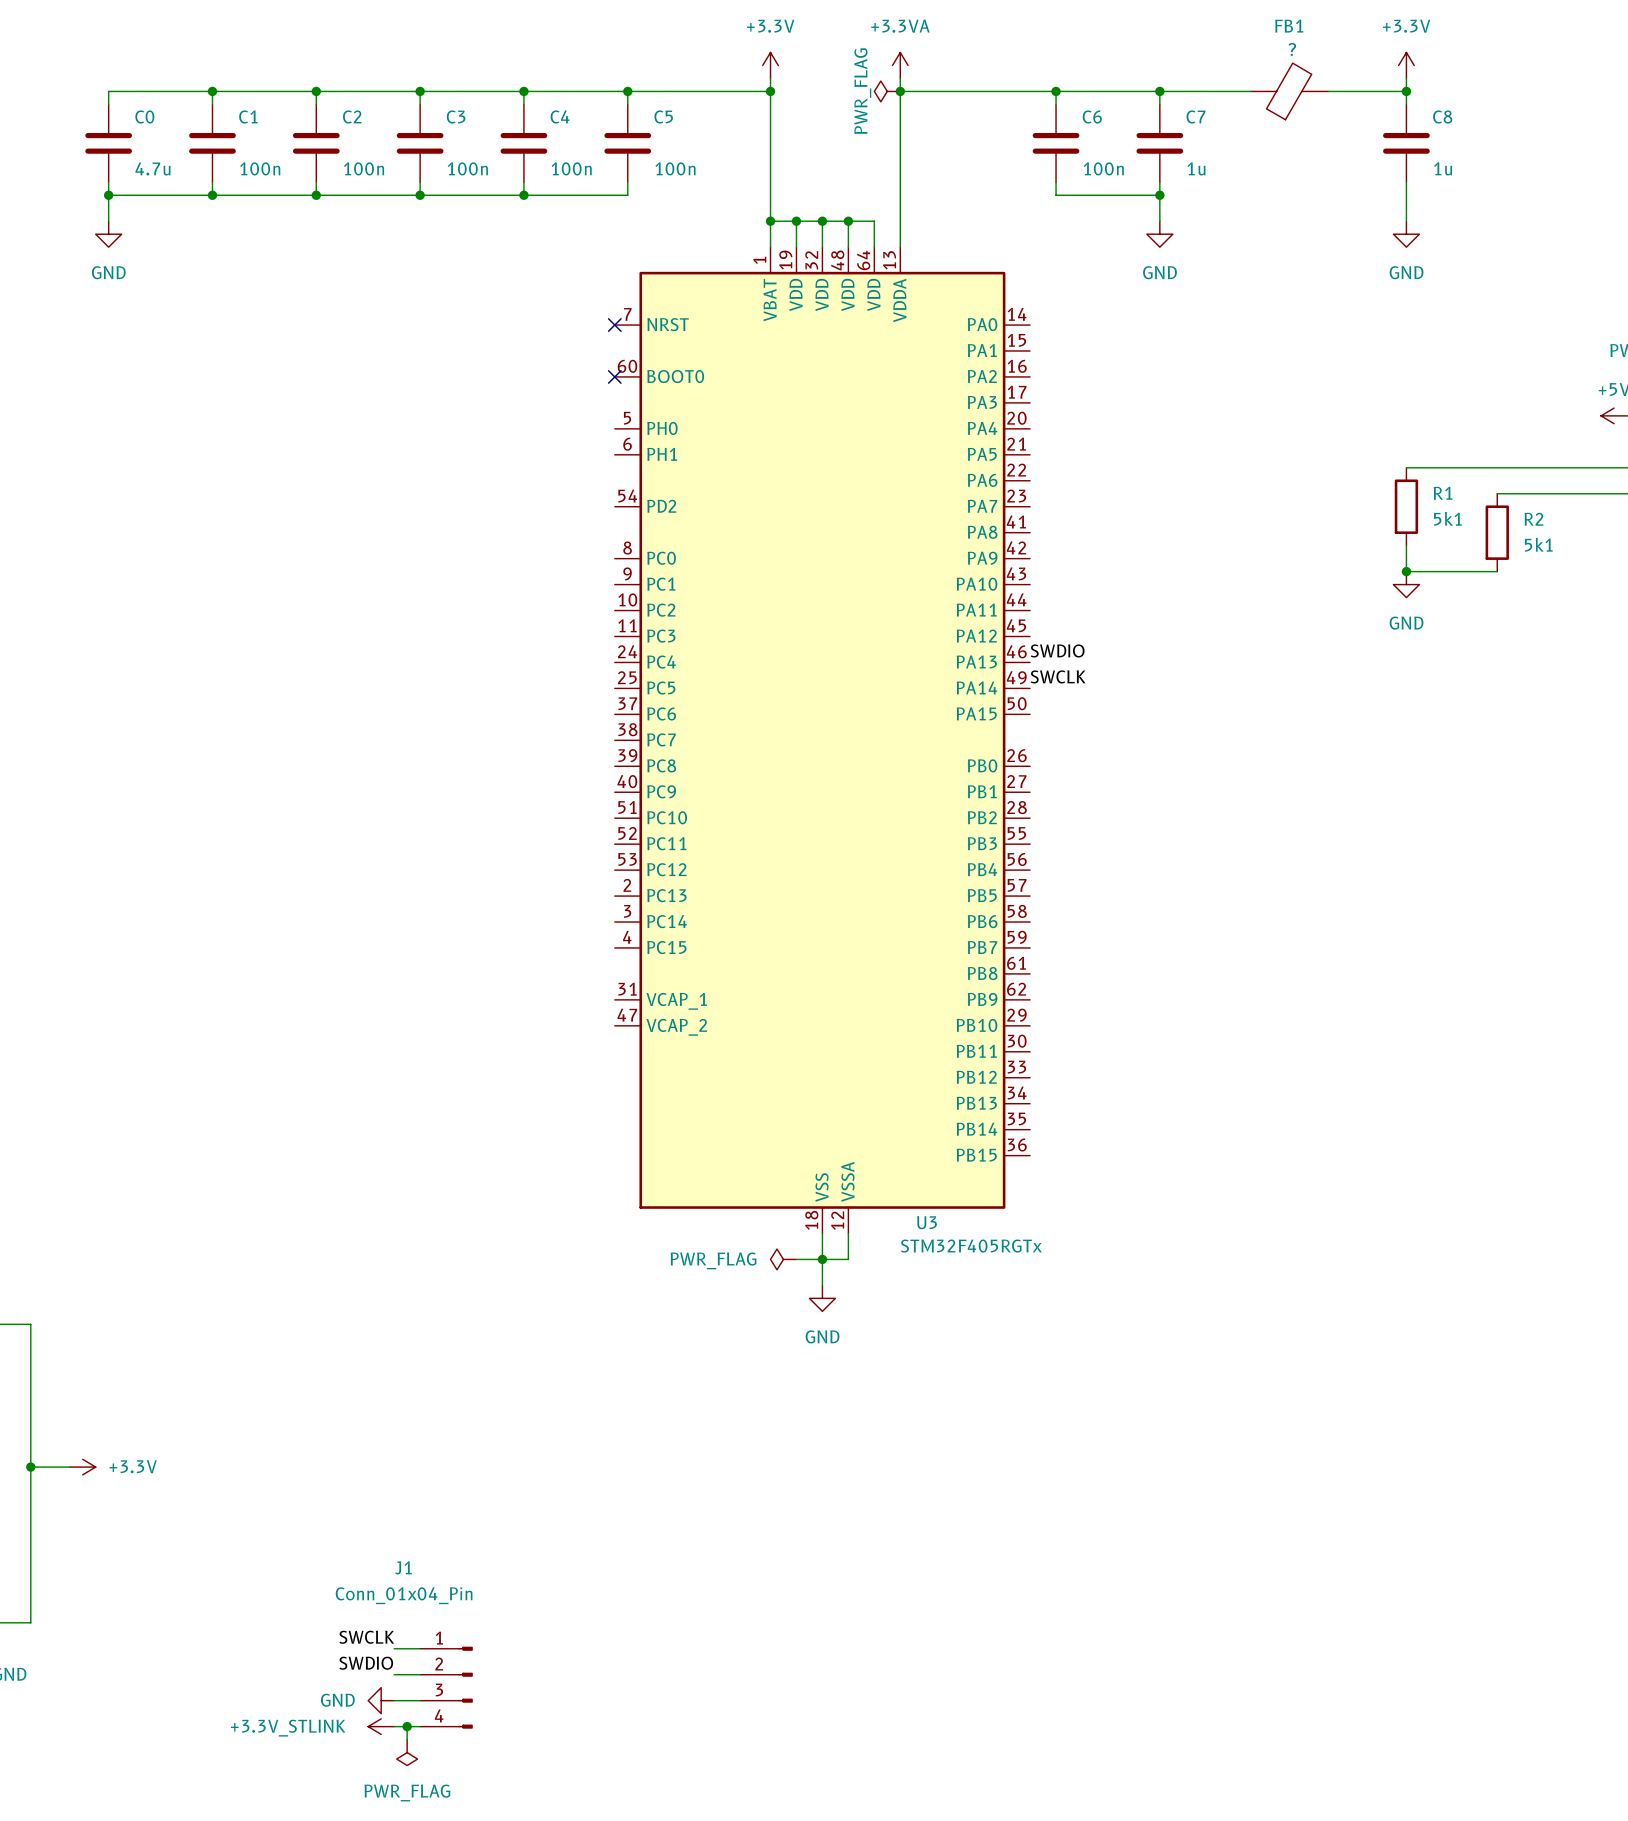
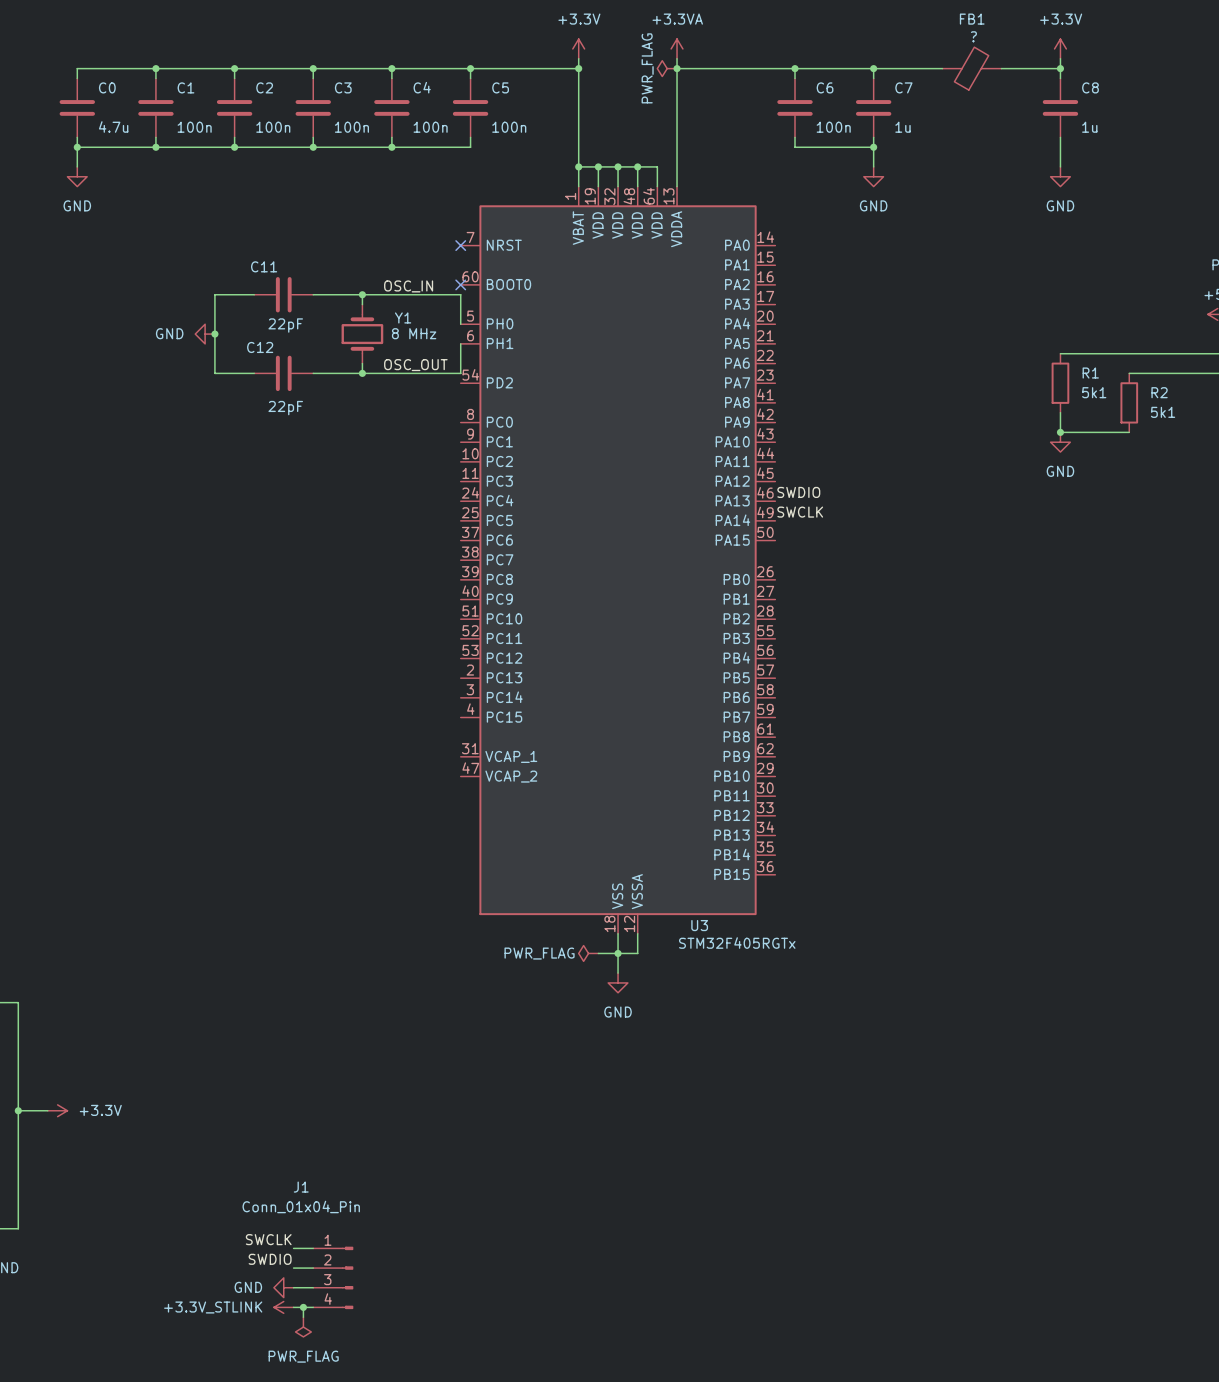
label: none -> OSC_IN (408, 286)
wire: none -> (254, 294) (214, 294) (214, 373) (254, 373)
C11: none -> 22pF (283, 294)
wire: none -> (313, 294) (460, 294) (460, 324)
wire: none -> (362, 294) (362, 304)
junction: none -> (362, 294)
power symbol: none -> GND (205, 334)
junction: none -> (214, 334)
Y1: none -> 8 MHz (362, 334)
wire: none -> (460, 343) (460, 373) (313, 373)
wire: none -> (362, 363) (362, 373)
label: none -> OSC_OUT (415, 365)
C12: none -> 22pF (283, 373)
junction: none -> (362, 373)

